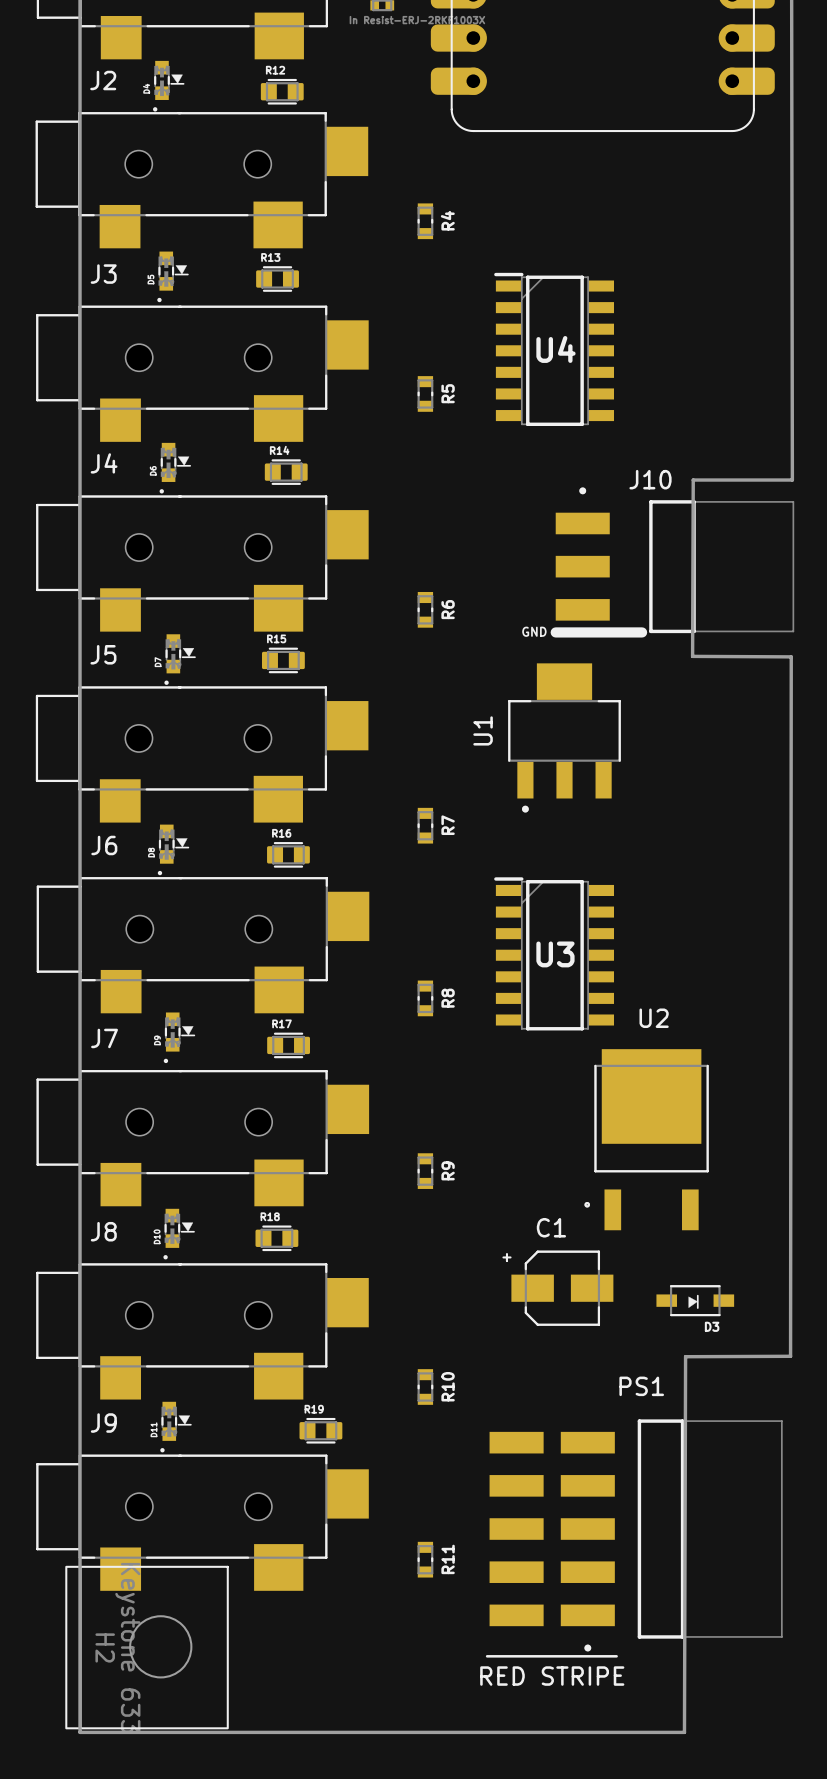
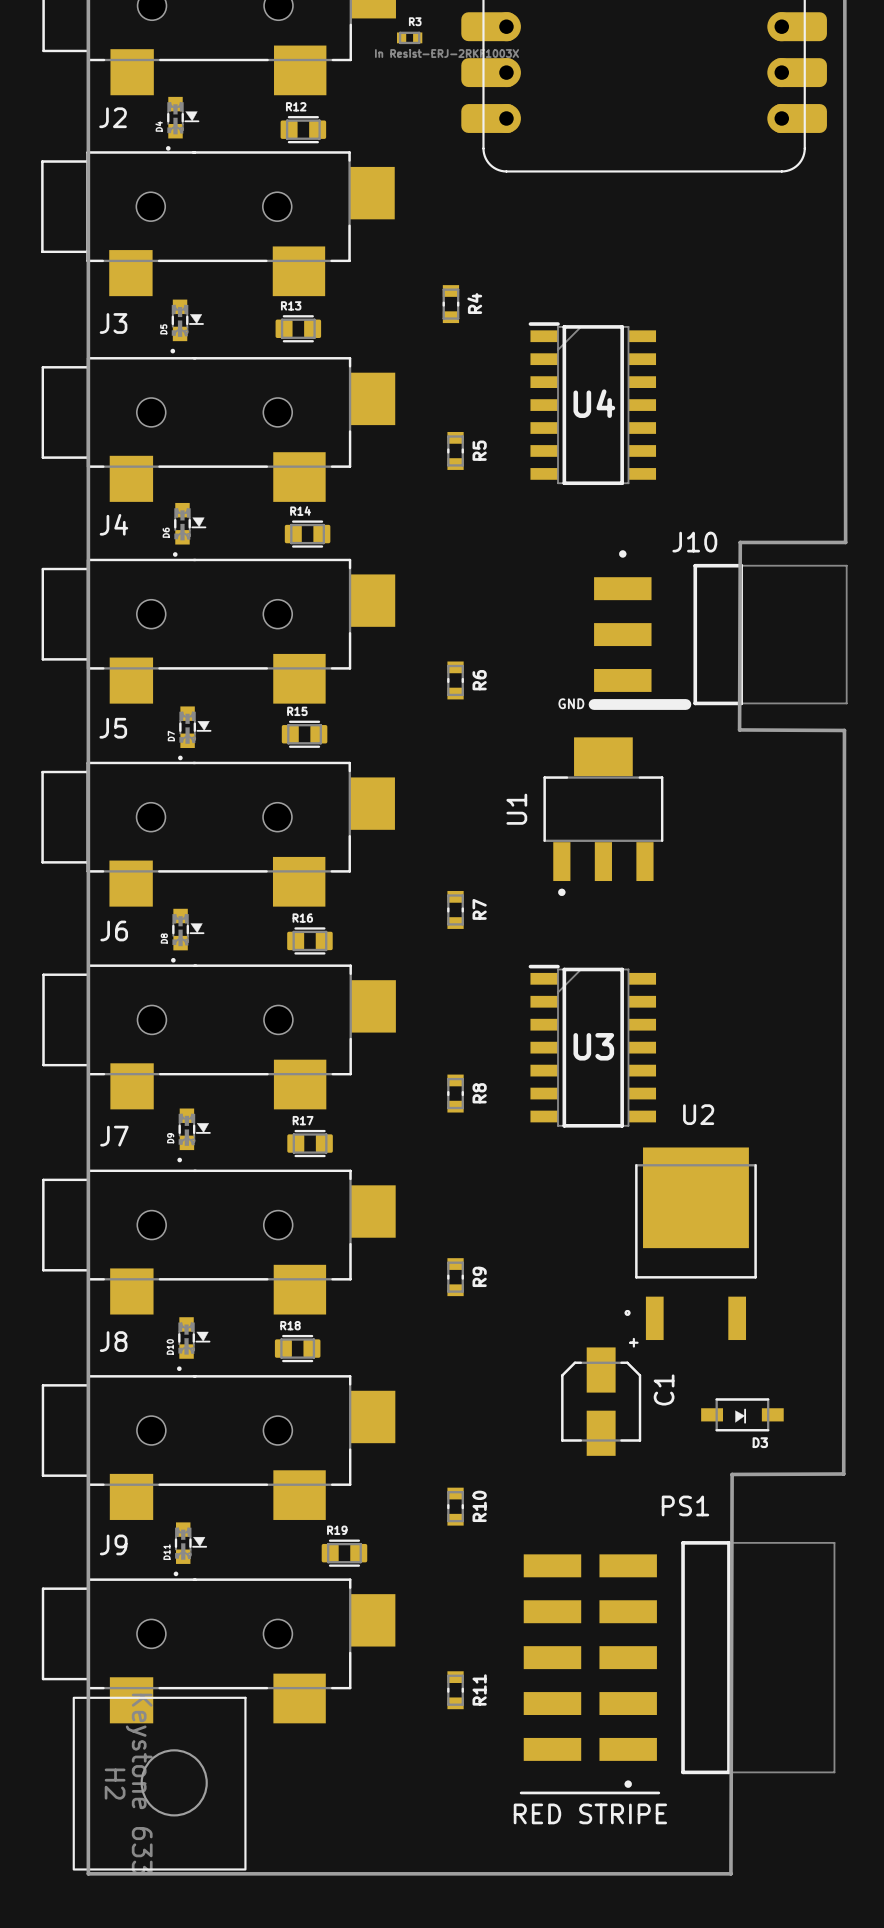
R4 position: (425, 221) -> (450, 304)
C1 name position: C1 (551, 1227) -> C1 (664, 1389)
C1 footprint: [502, 1250, 614, 1326] -> [561, 1337, 642, 1456]

